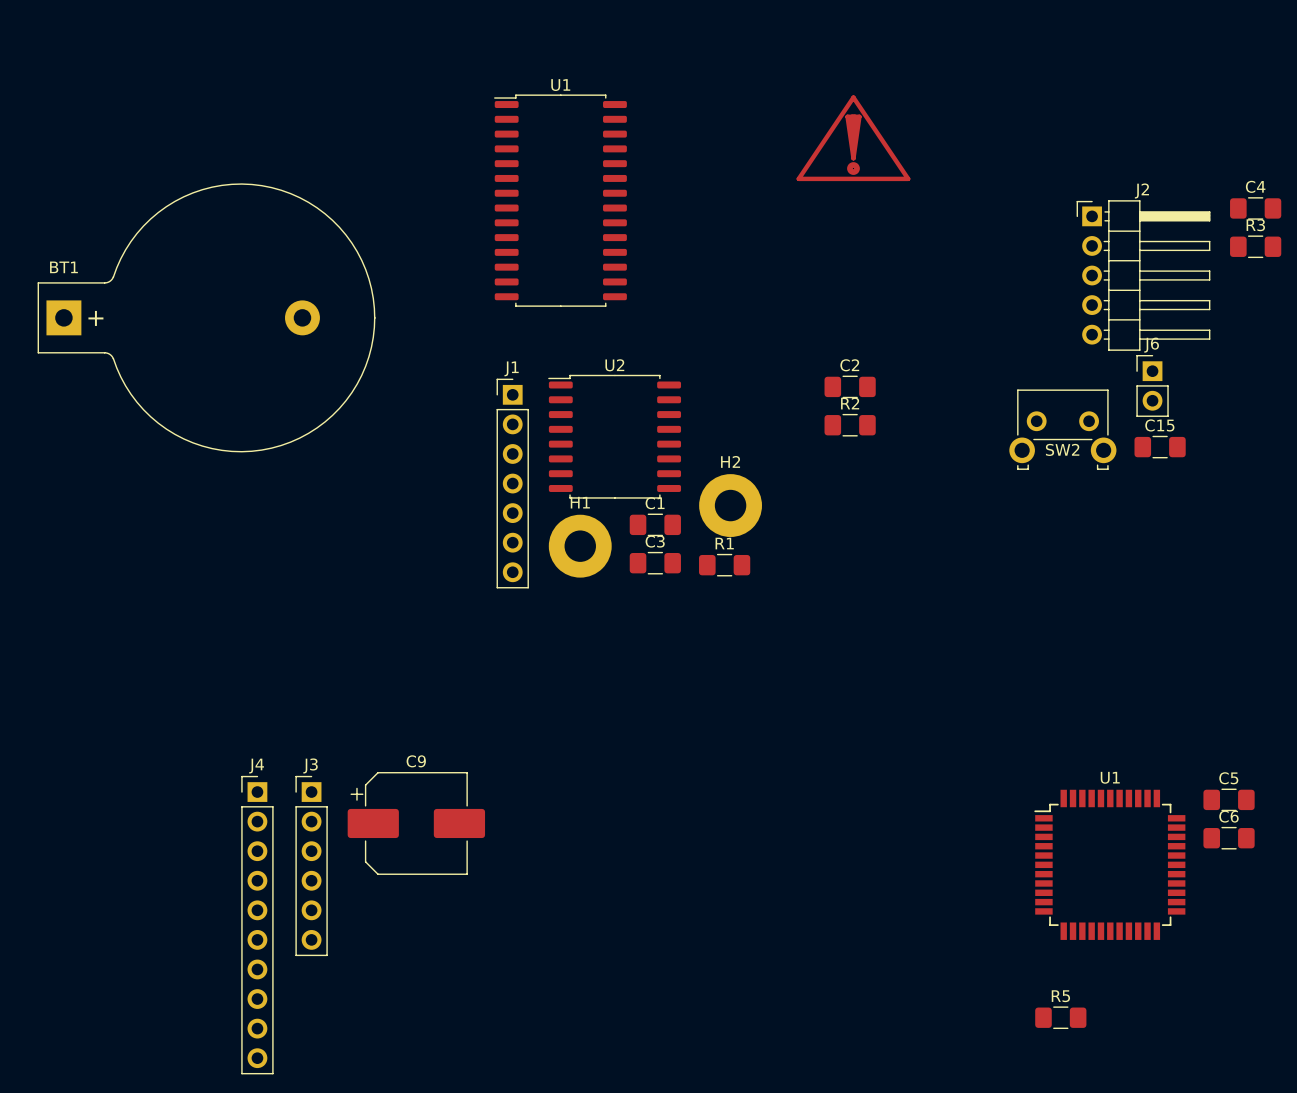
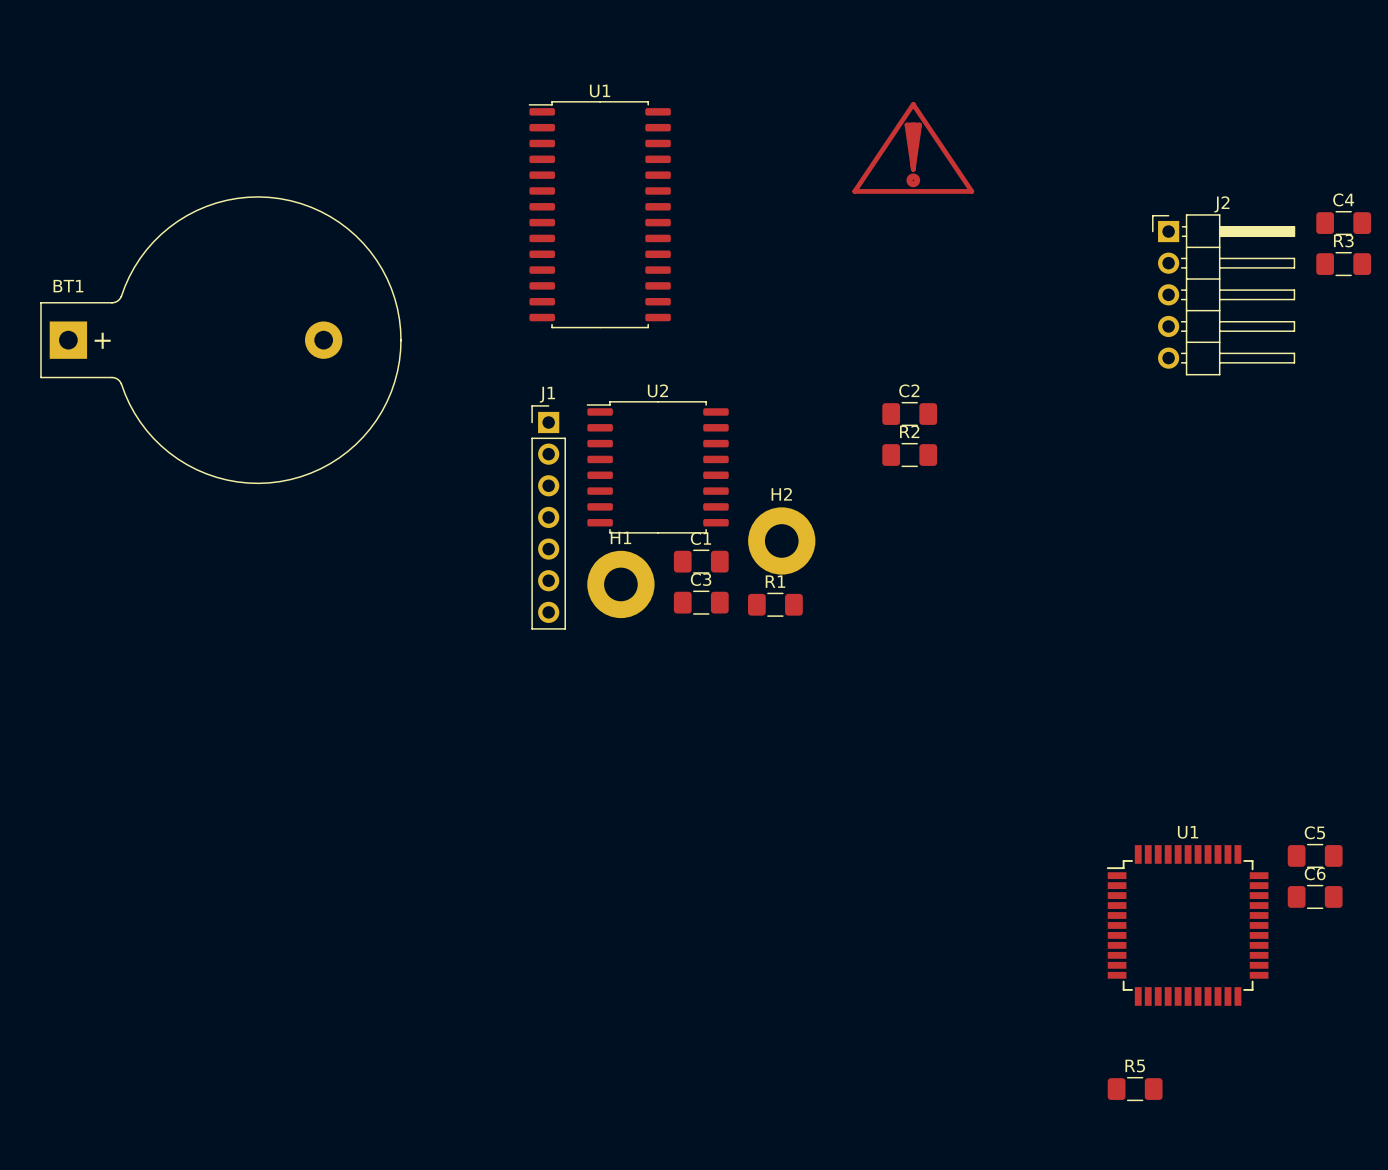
J6: (1152, 385) -> none
SW2: (1062, 429) -> none
C15: (1160, 447) -> none
C9: (416, 823) -> none
J3: (311, 865) -> none
J4: (257, 925) -> none

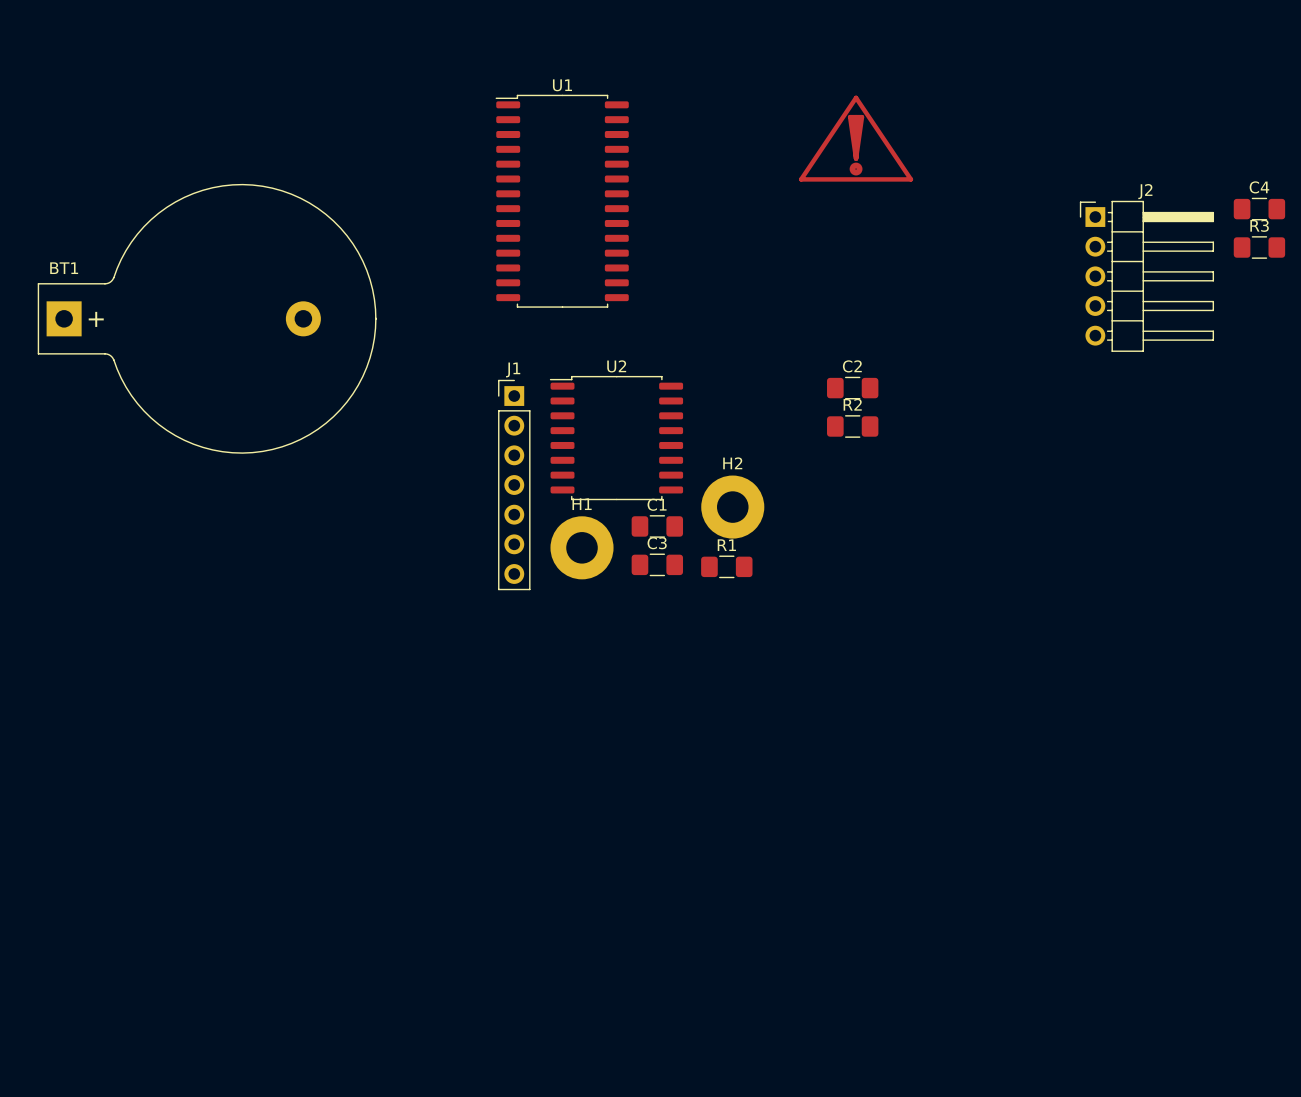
C5: (1315, 855) -> none
C6: (1315, 896) -> none
U1: (1187, 925) -> none
R5: (1135, 1089) -> none

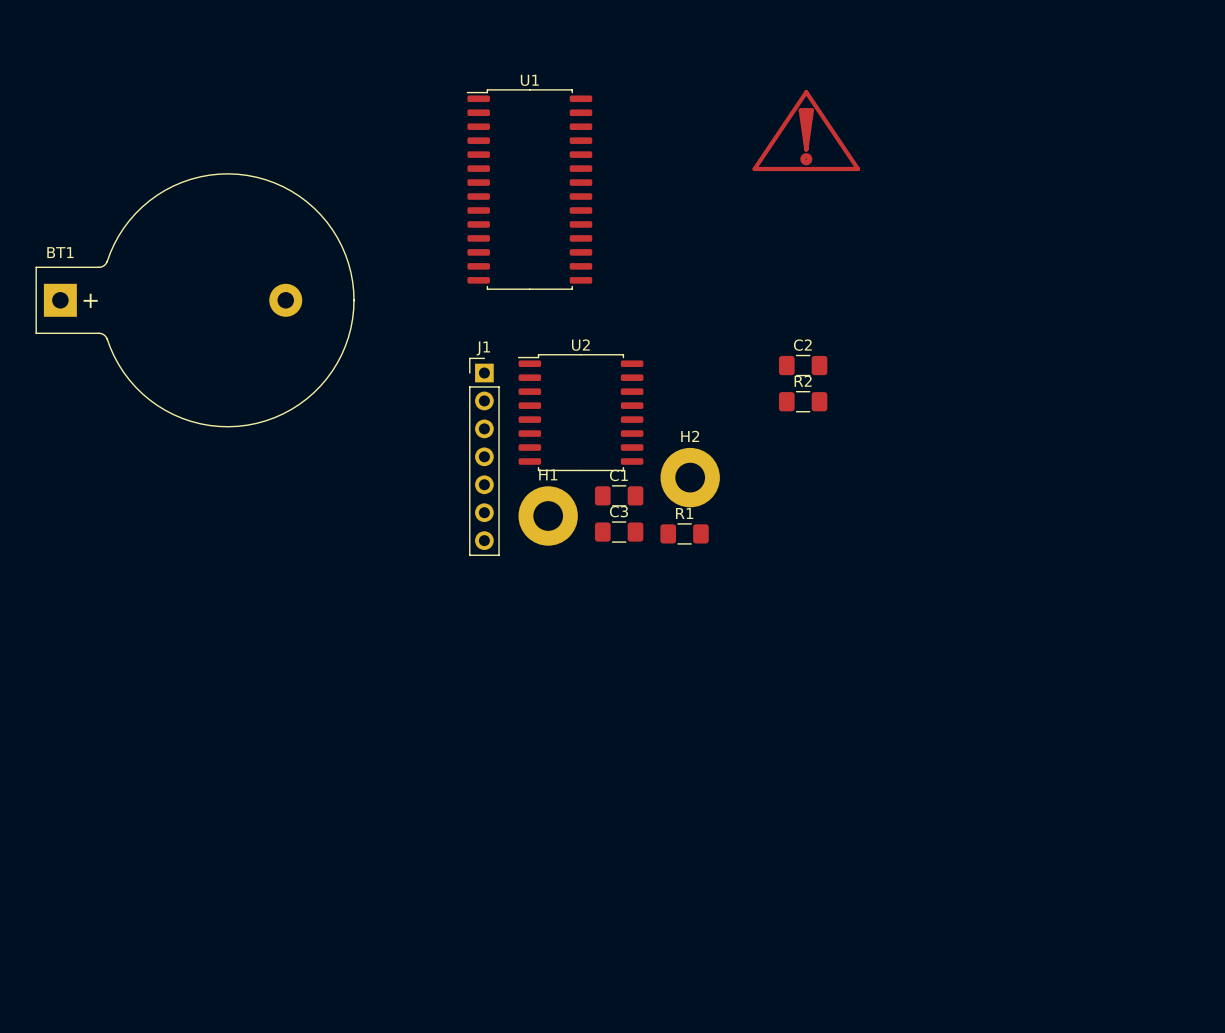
C4: (1259, 209) -> none
R3: (1259, 247) -> none
J2: (1146, 276) -> none

